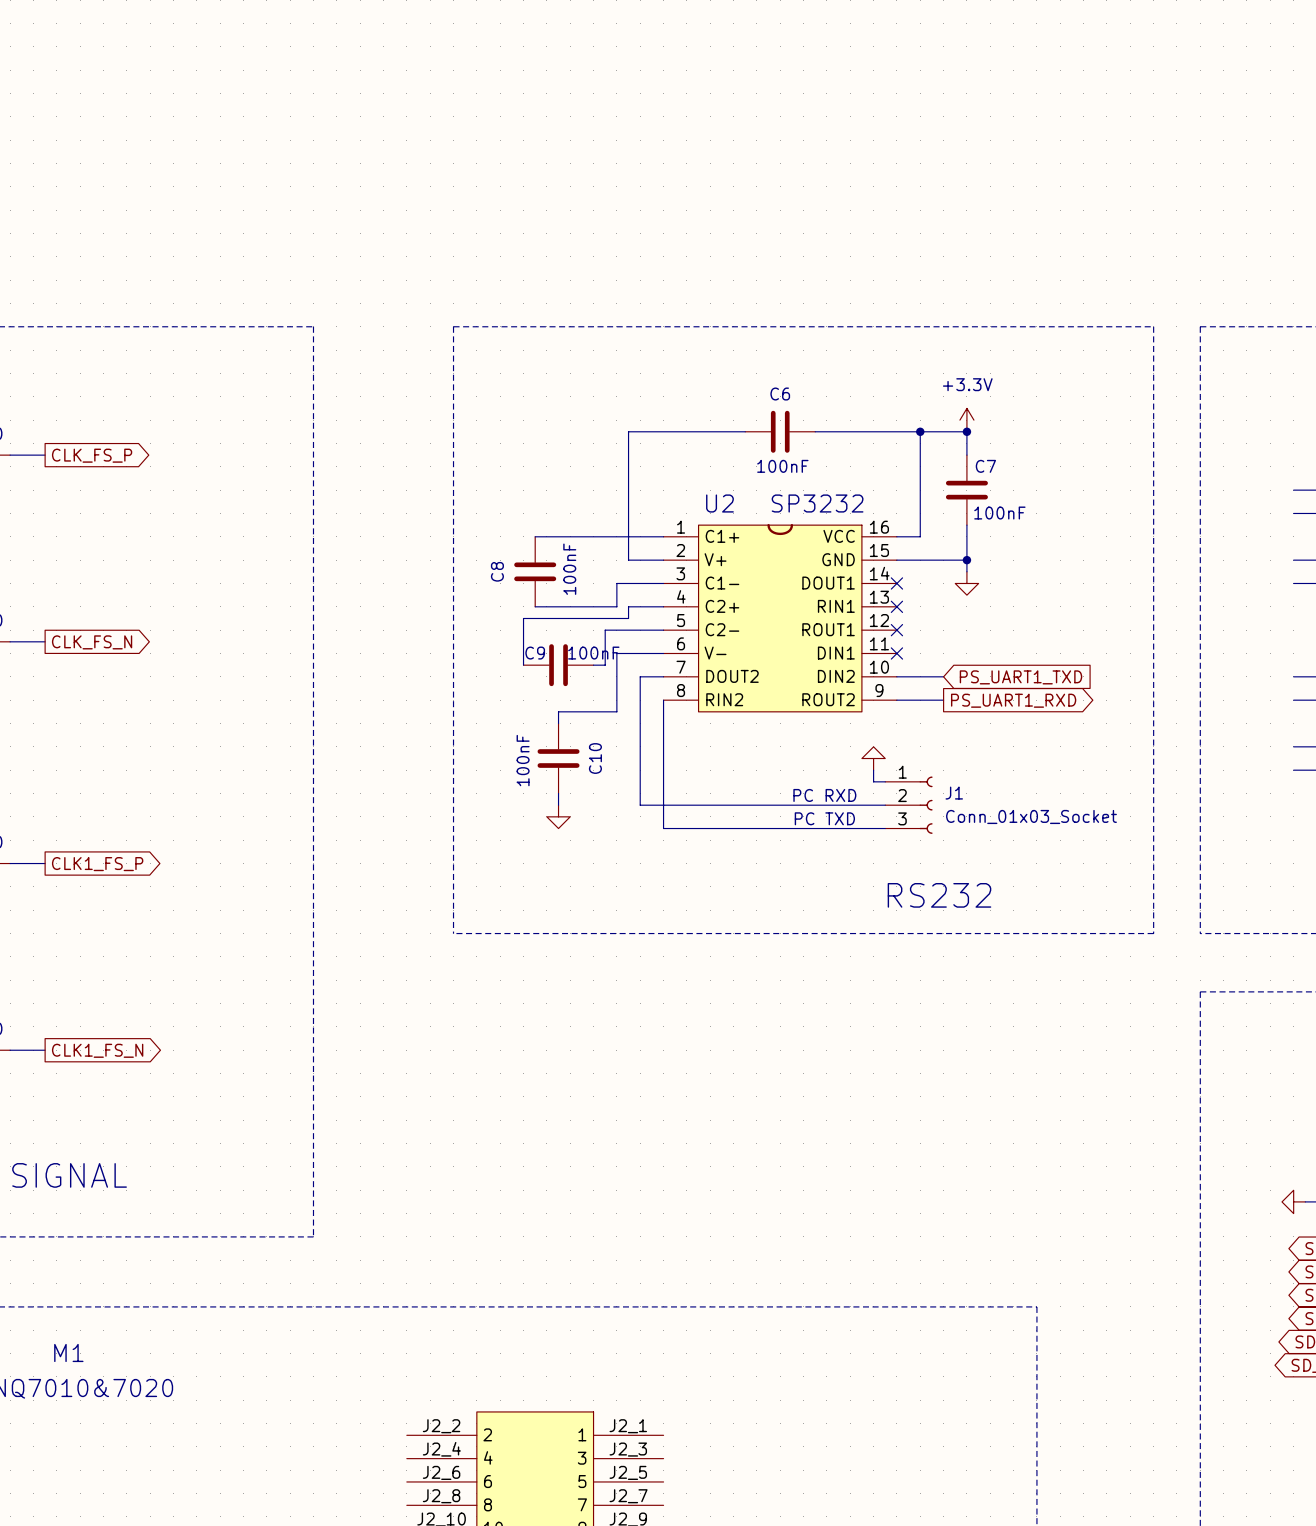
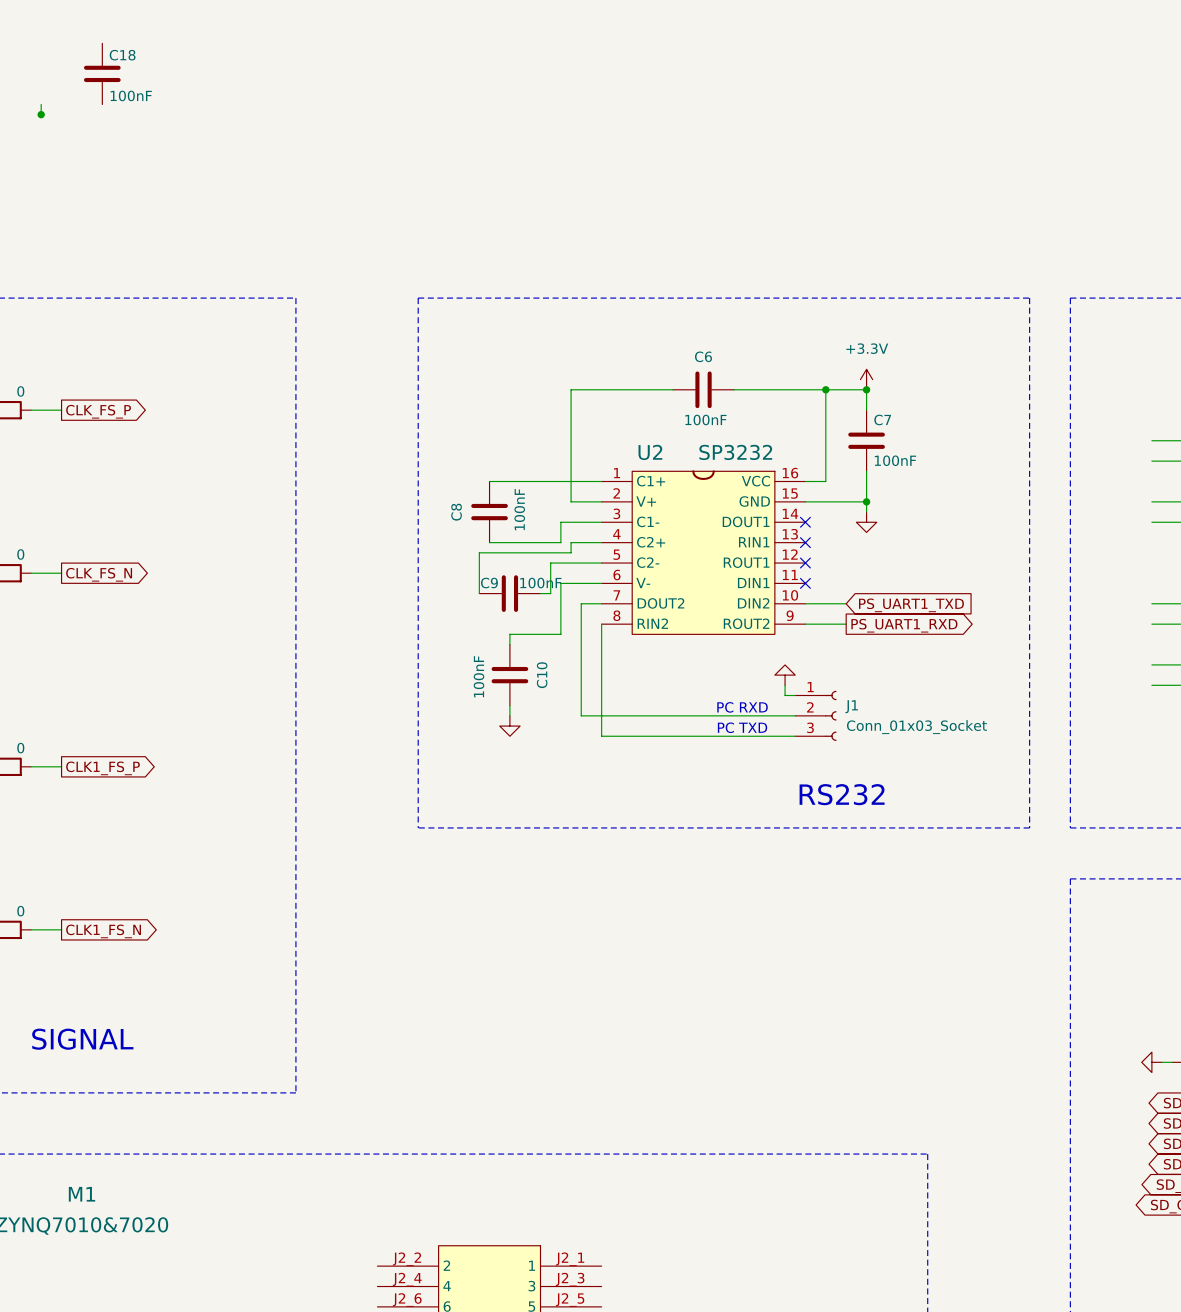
C18: none -> 100nF (102, 73)
wire: none -> (41, 104) (41, 114)
junction: none -> (41, 114)

